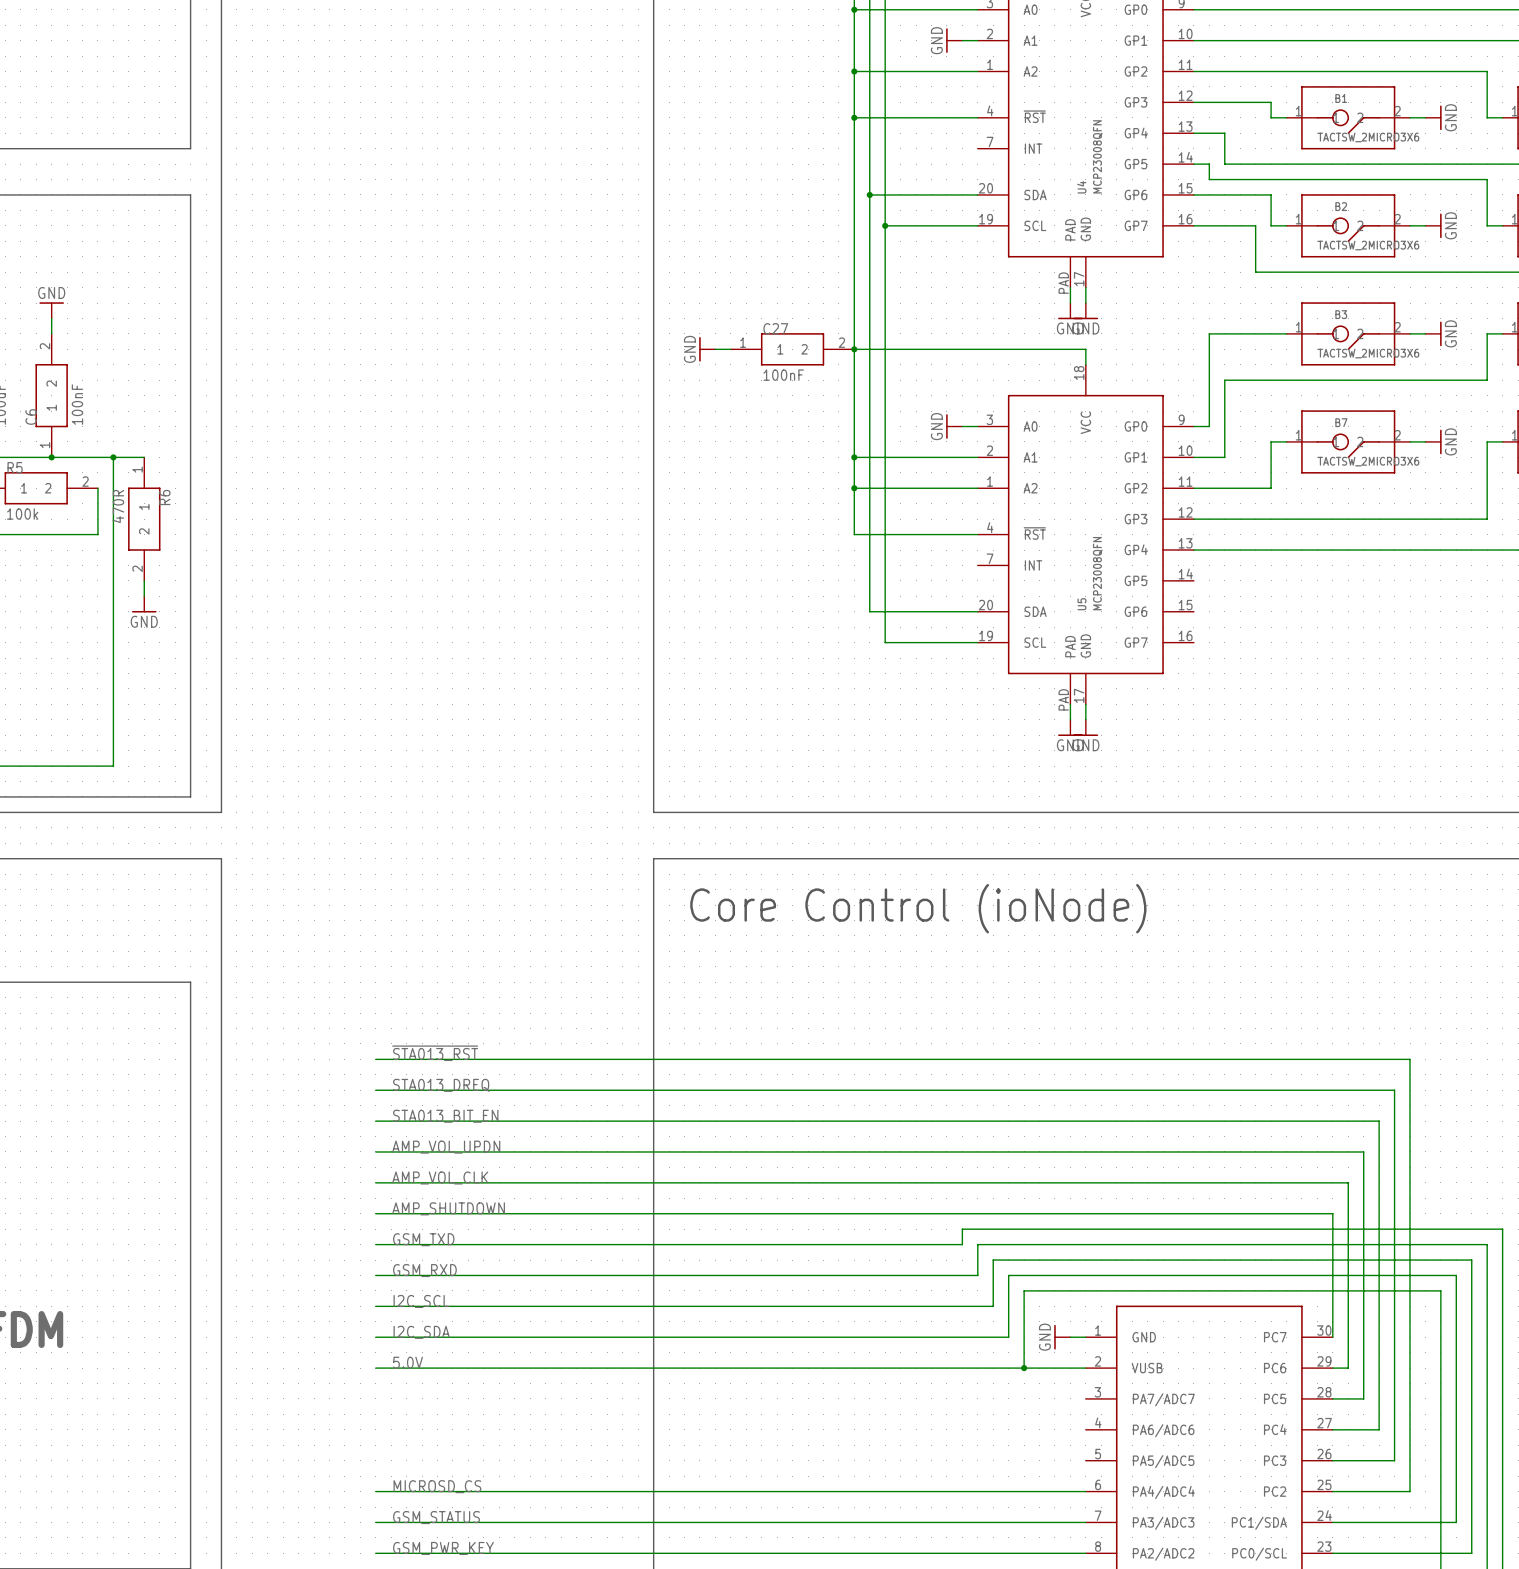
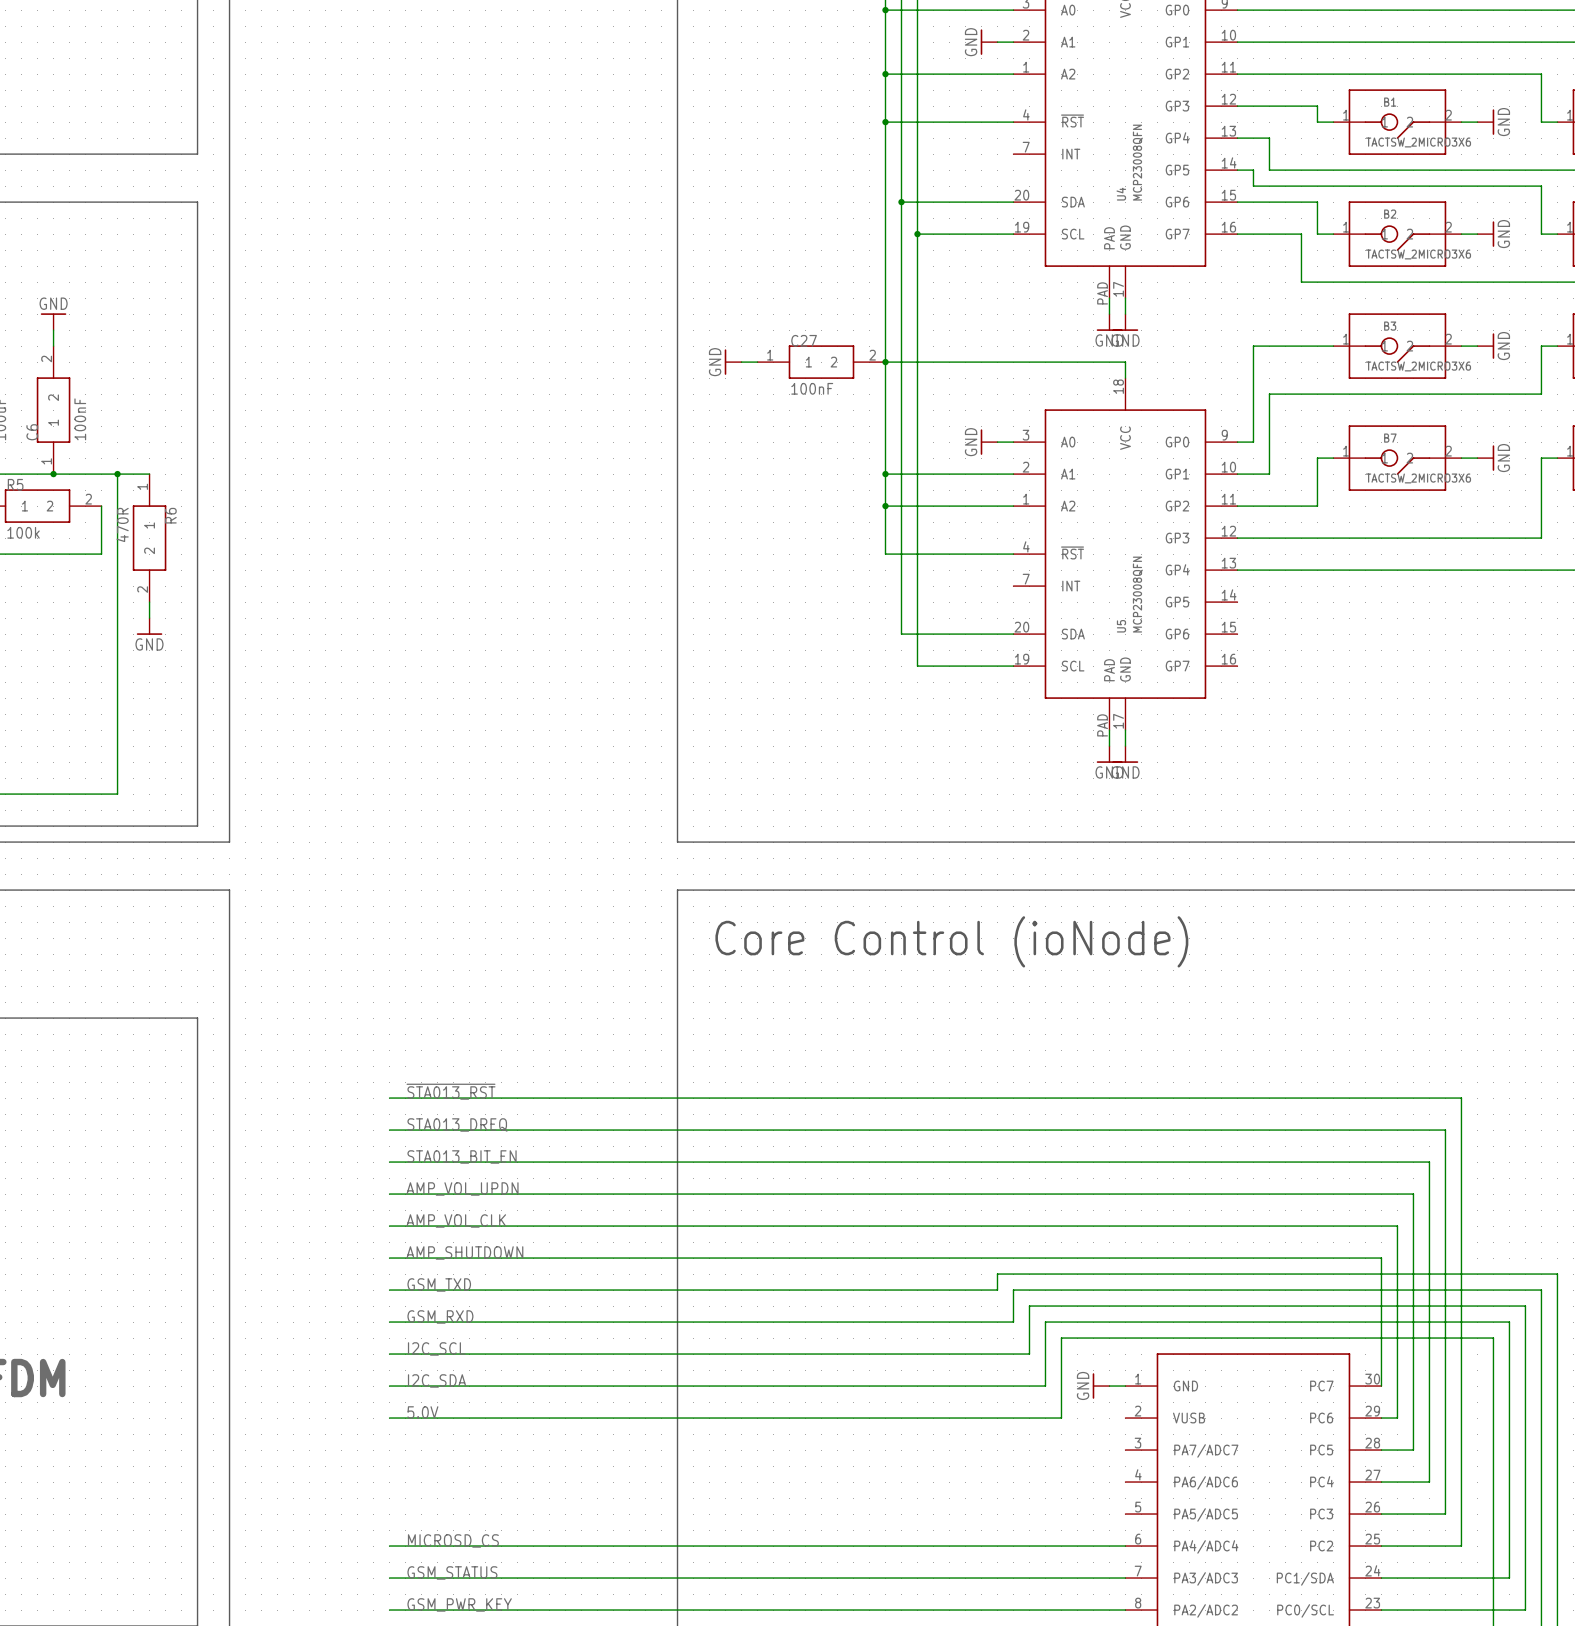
wire: (1024, 1368) (1085, 1368) -> none
junction: (1024, 1368) -> none

